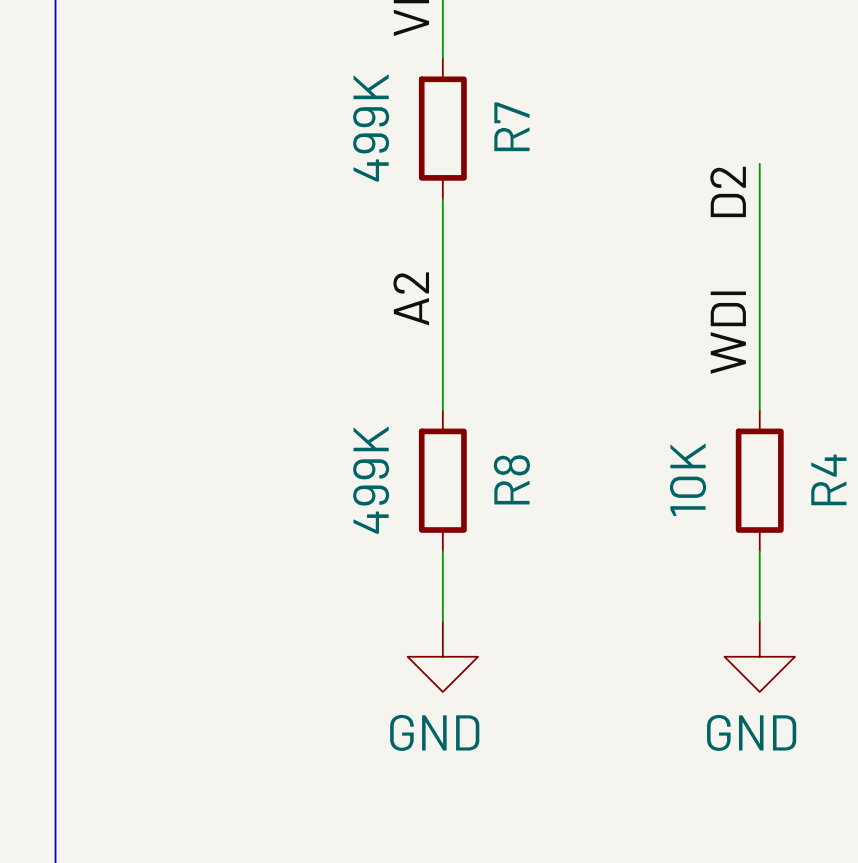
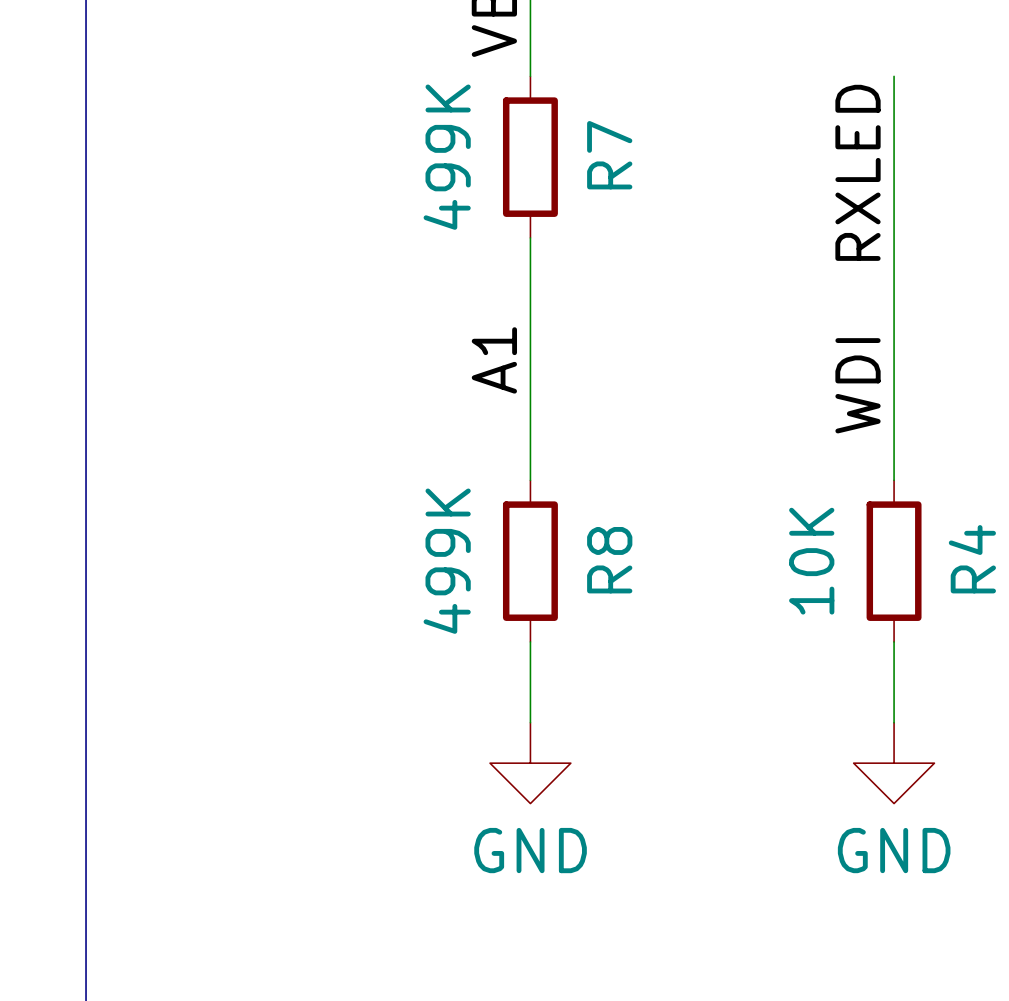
wire: none -> (894, 76) (894, 197)
label: none -> RXLED (858, 172)
label: D2 (728, 191) -> none
label: A2 (411, 298) -> A1 (494, 360)

